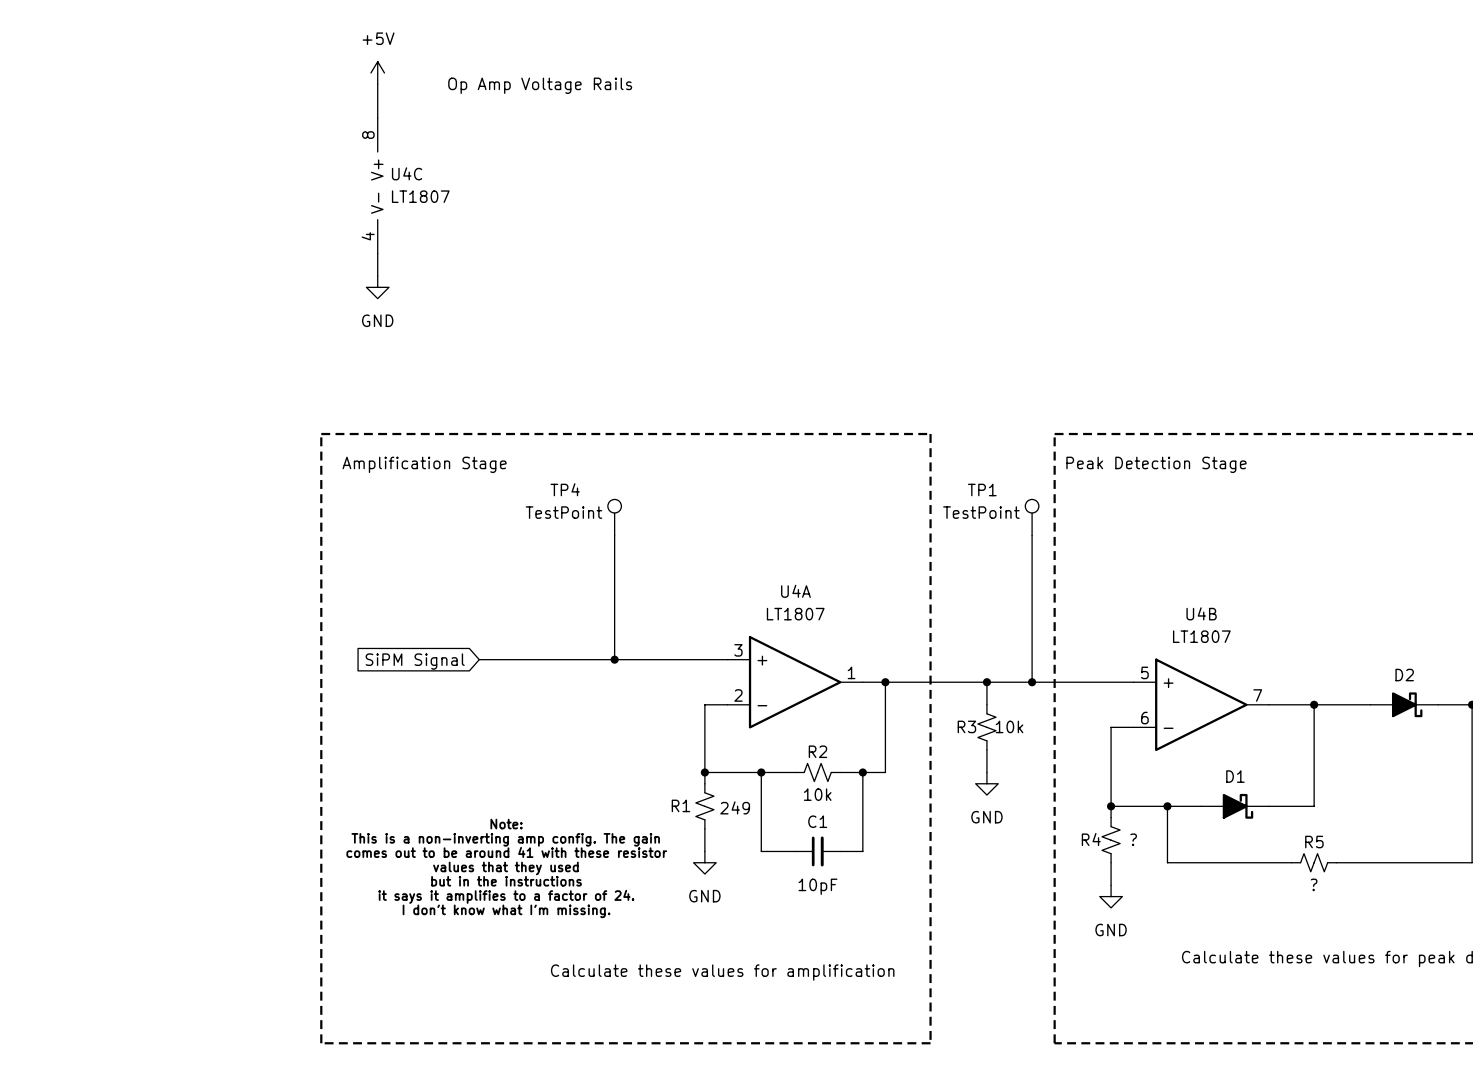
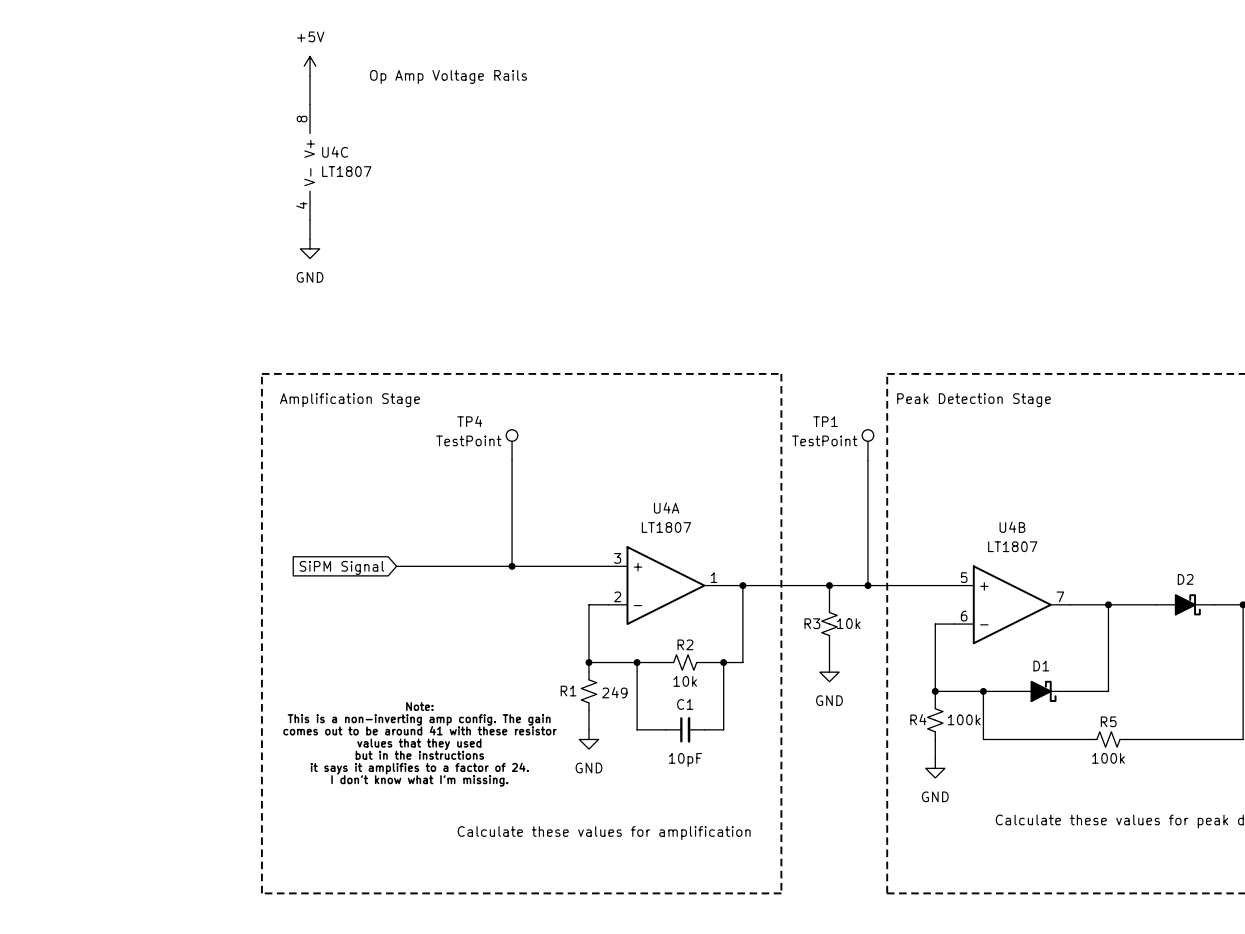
R4 value: ? (1133, 839) -> 100k (964, 719)
R5 value: ? (1314, 884) -> 100k (1108, 758)

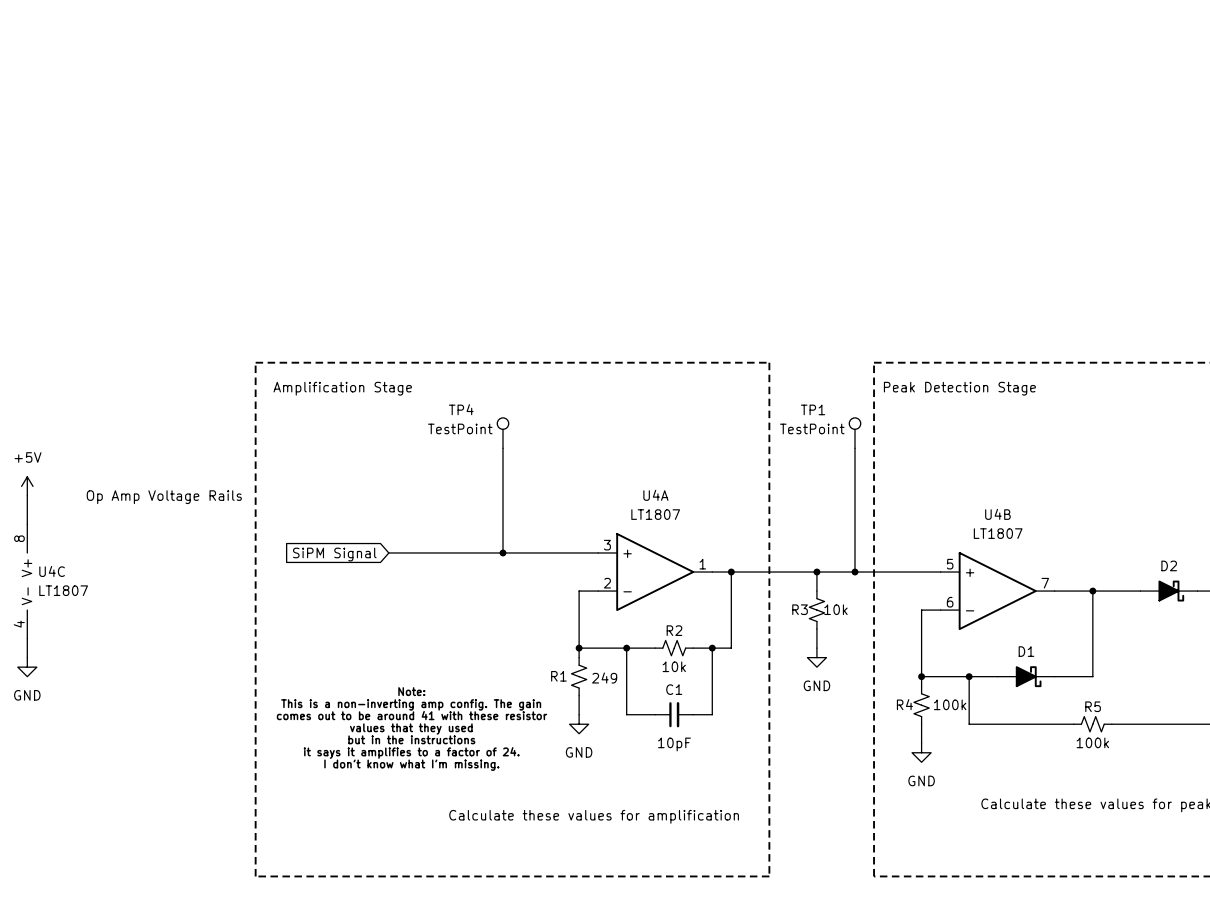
power symbol: +5V (310, 66) -> none
wire: (310, 75) (310, 104) -> none
text: Op Amp Voltage Rails (448, 77) -> none
U4C position: (310, 162) -> (27, 581)
wire: (310, 220) (310, 239) -> none
power symbol: GND (310, 248) -> none
power symbol: none -> +5V (27, 486)
wire: none -> (27, 495) (27, 524)
text: none -> Op Amp Voltage Rails (164, 497)
wire: none -> (27, 638) (27, 657)
power symbol: none -> GND (27, 667)

